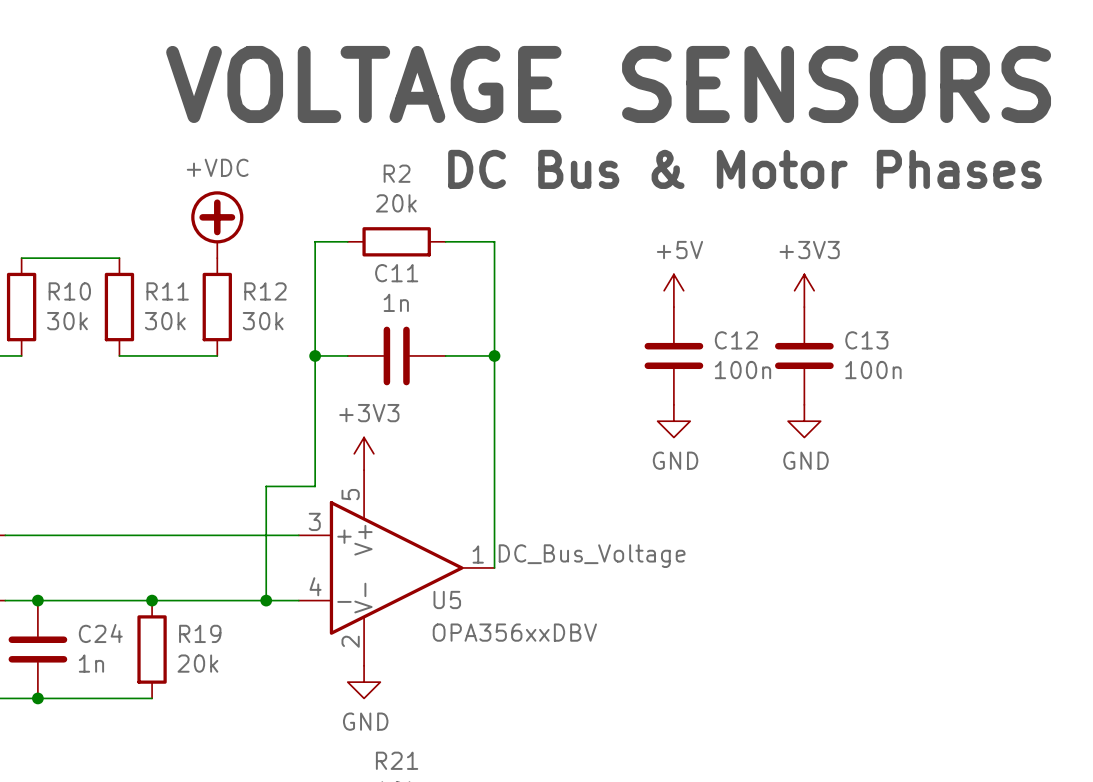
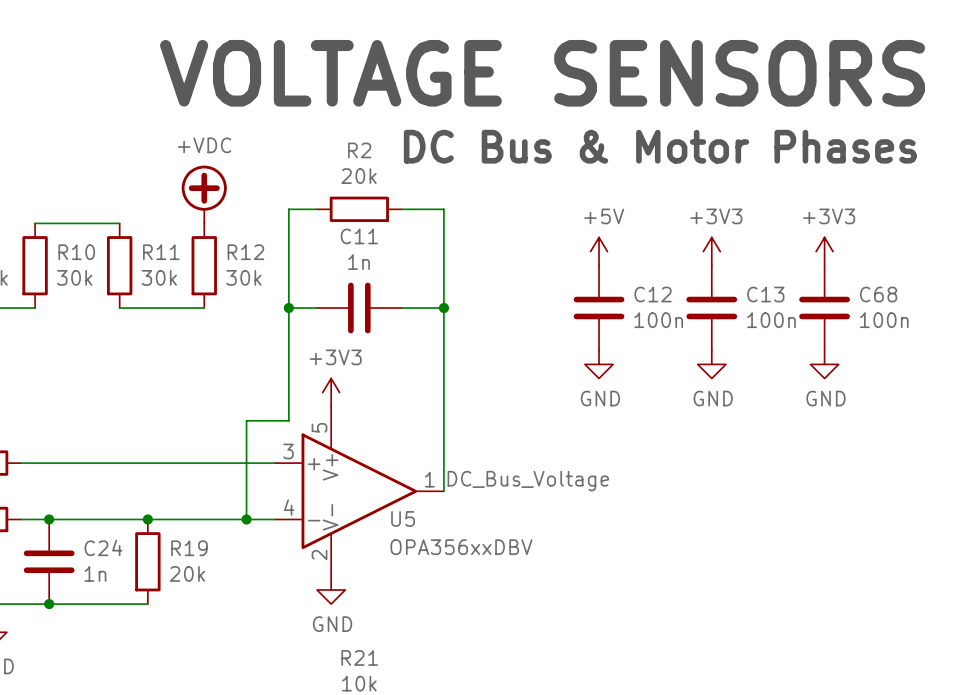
power symbol: none -> +3V3 (824, 251)
C68: none -> 100n (824, 308)
power symbol: none -> GND (824, 364)

